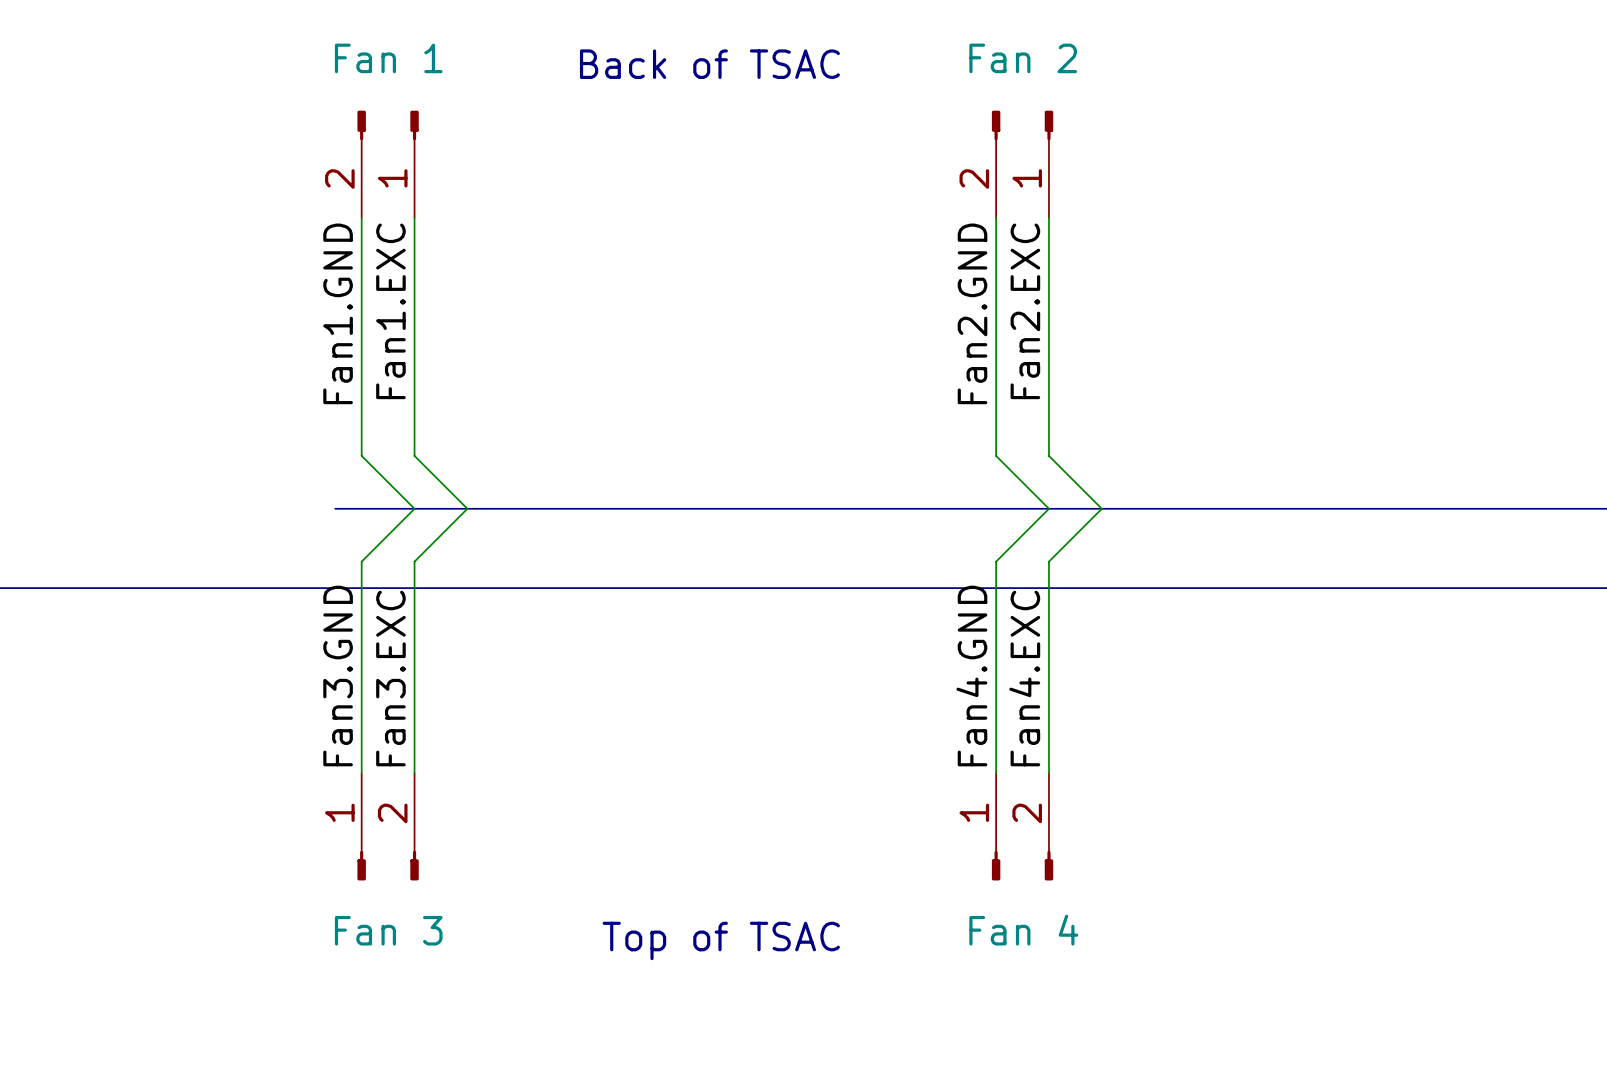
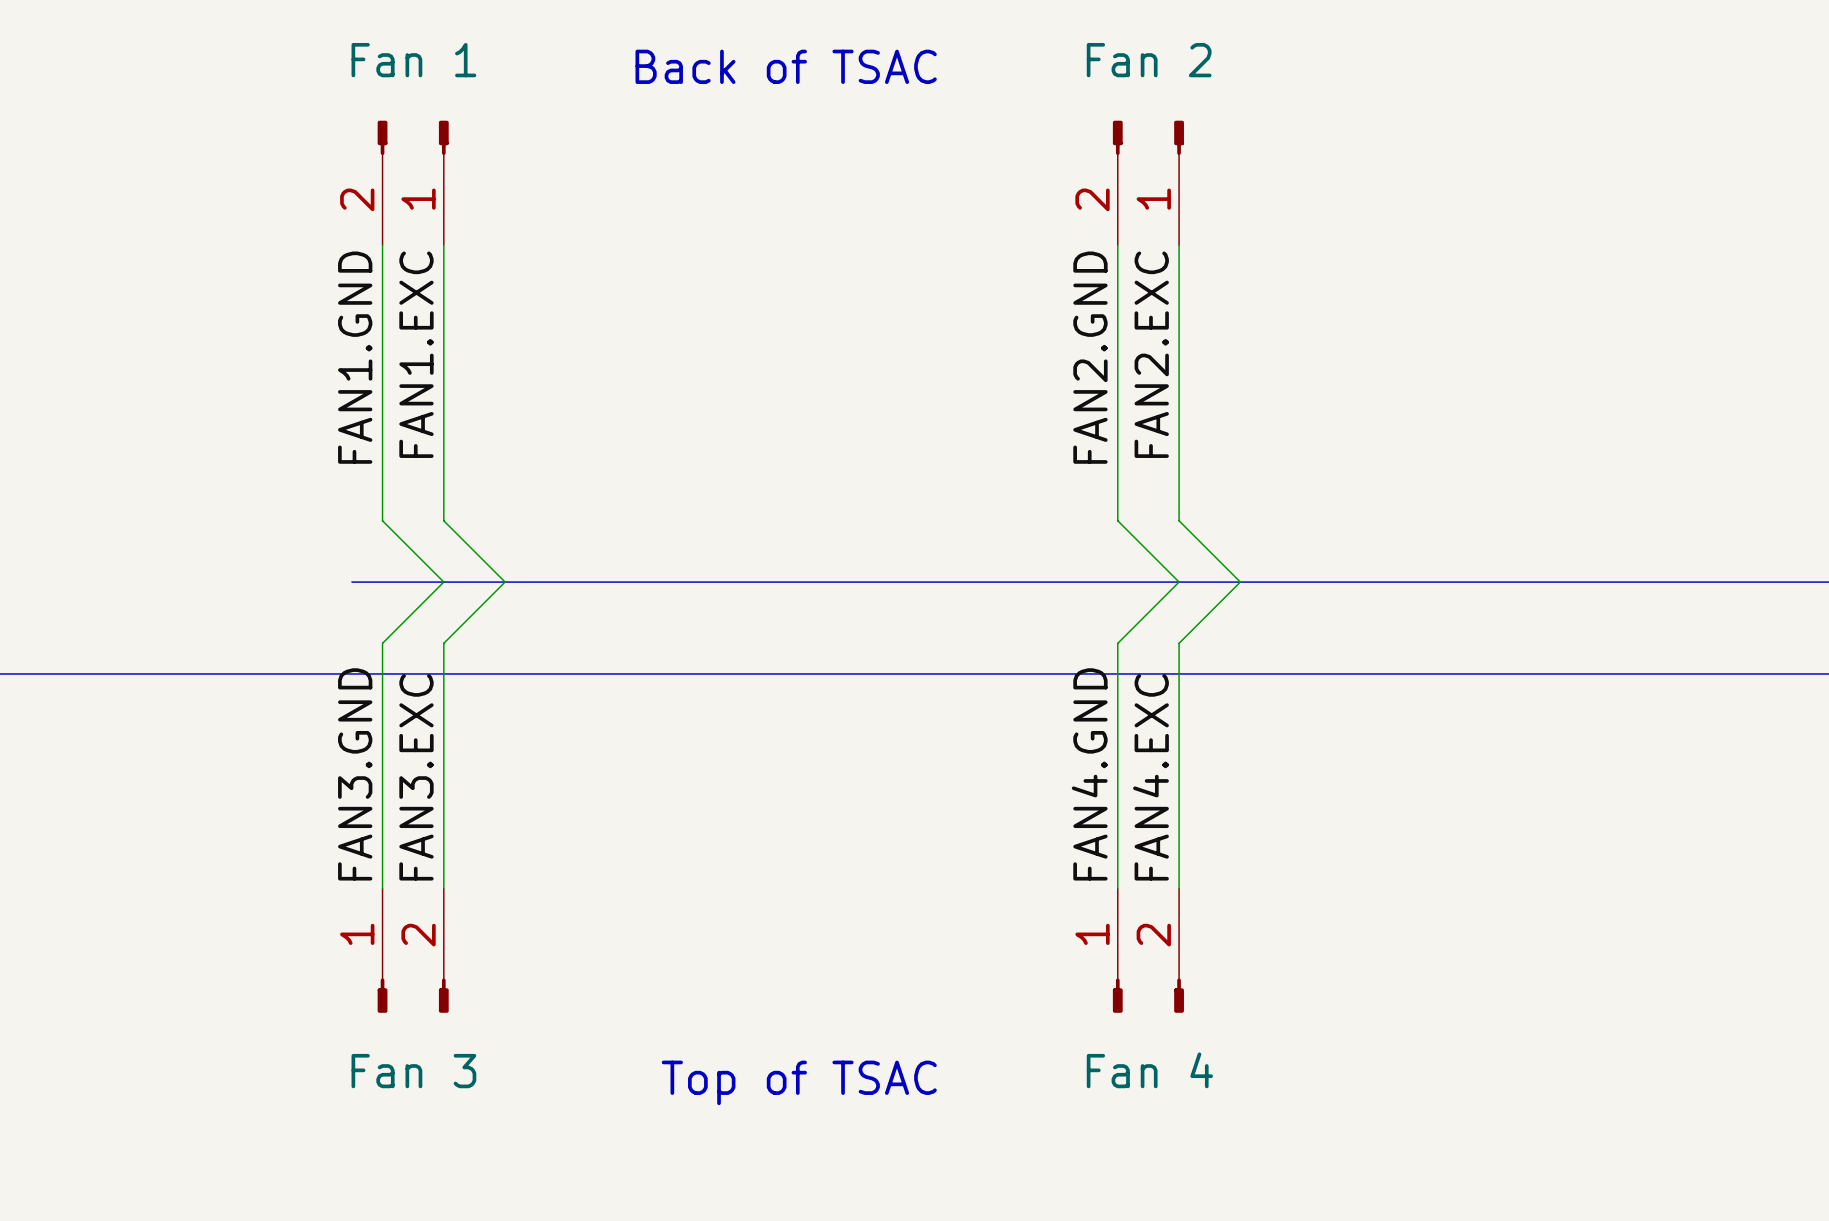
label: Fan1.EXC (390, 311) -> FAN1.EXC (416, 354)
label: Fan2.EXC (1025, 311) -> FAN2.EXC (1151, 354)
label: Fan1.GND (338, 313) -> FAN1.GND (355, 357)
label: Fan2.GND (972, 313) -> FAN2.GND (1090, 357)
label: Fan3.GND (338, 676) -> FAN3.GND (355, 774)
label: Fan4.GND (971, 676) -> FAN4.GND (1089, 774)
label: Fan3.EXC (390, 678) -> FAN3.EXC (416, 777)
label: Fan4.EXC (1024, 678) -> FAN4.EXC (1150, 777)

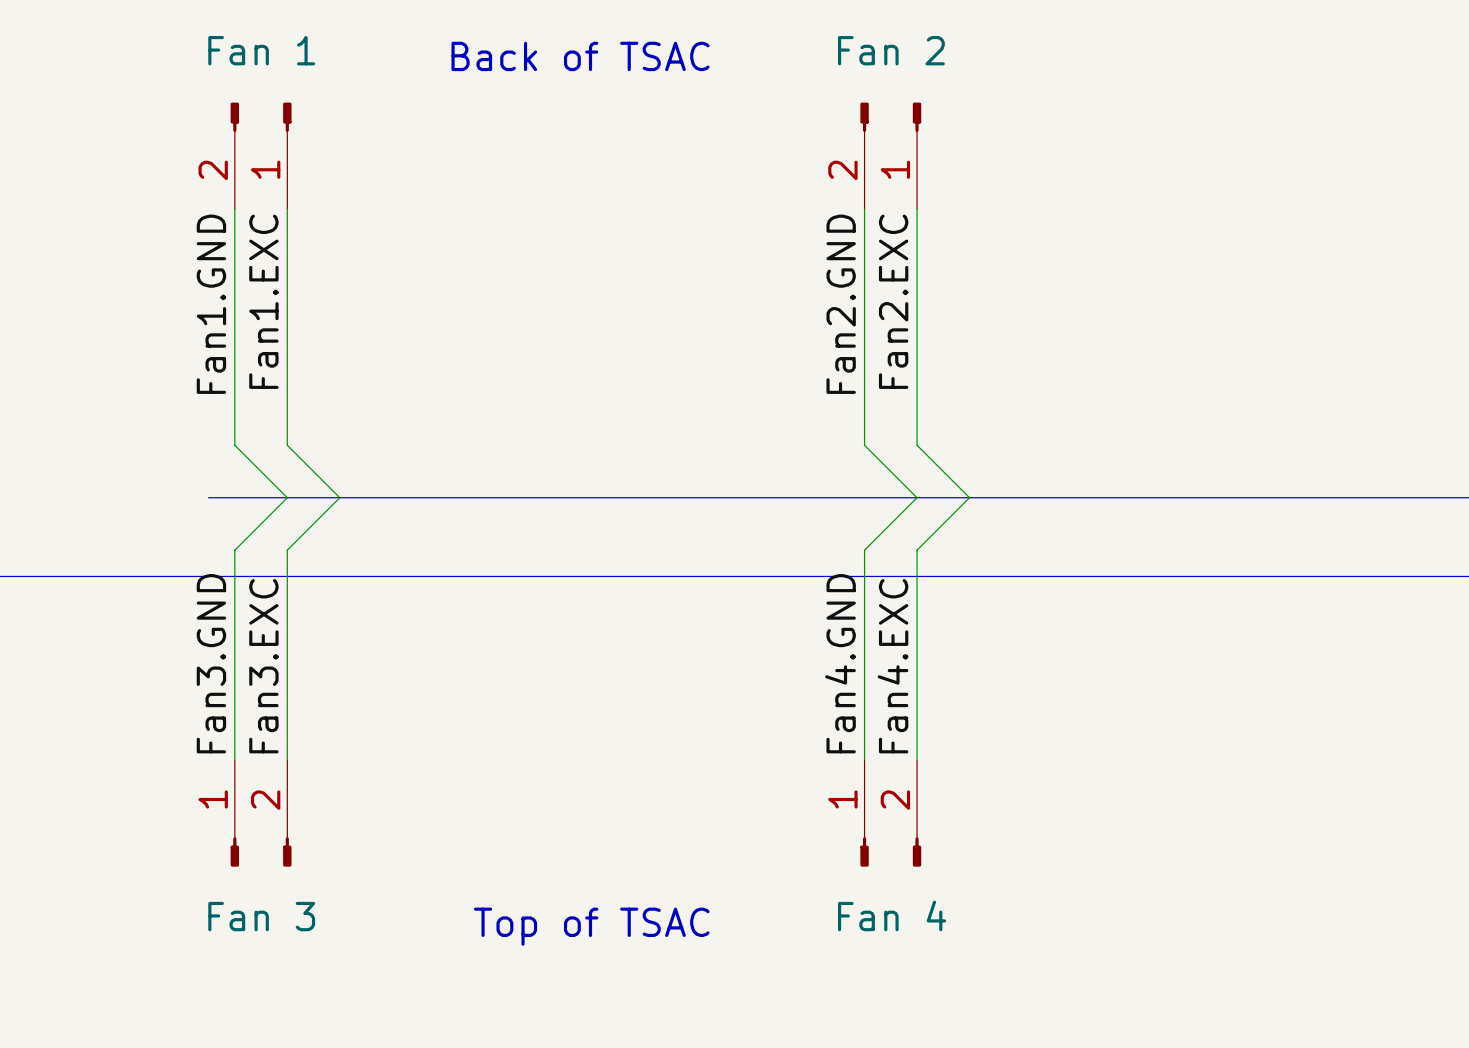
label: FAN1.EXC (416, 354) -> Fan1.EXC (263, 301)
label: FAN2.EXC (1151, 354) -> Fan2.EXC (893, 301)
label: FAN1.GND (355, 357) -> Fan1.GND (211, 304)
label: FAN2.GND (1090, 357) -> Fan2.GND (841, 304)
label: FAN3.GND (355, 774) -> Fan3.GND (211, 663)
label: FAN4.GND (1089, 774) -> Fan4.GND (840, 663)
label: FAN3.EXC (416, 777) -> Fan3.EXC (263, 666)
label: FAN4.EXC (1150, 777) -> Fan4.EXC (893, 666)

